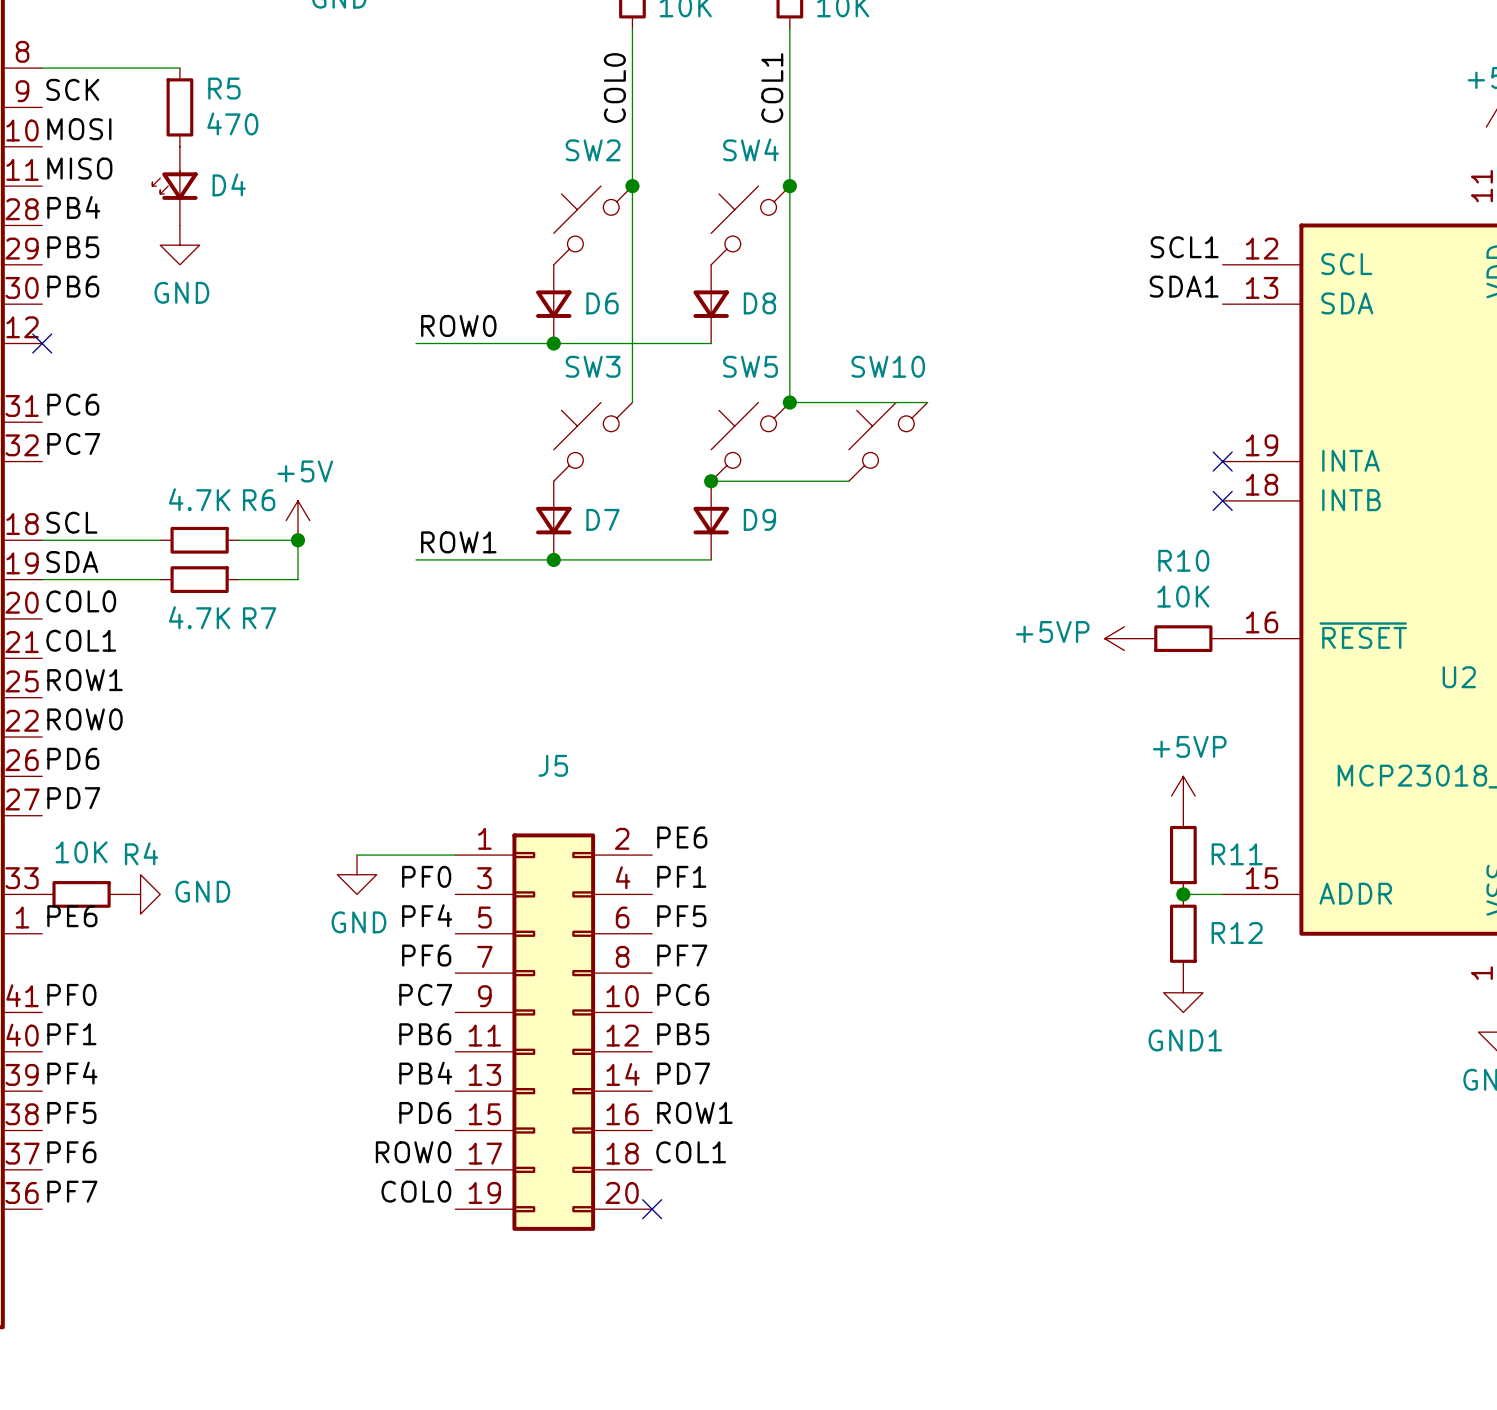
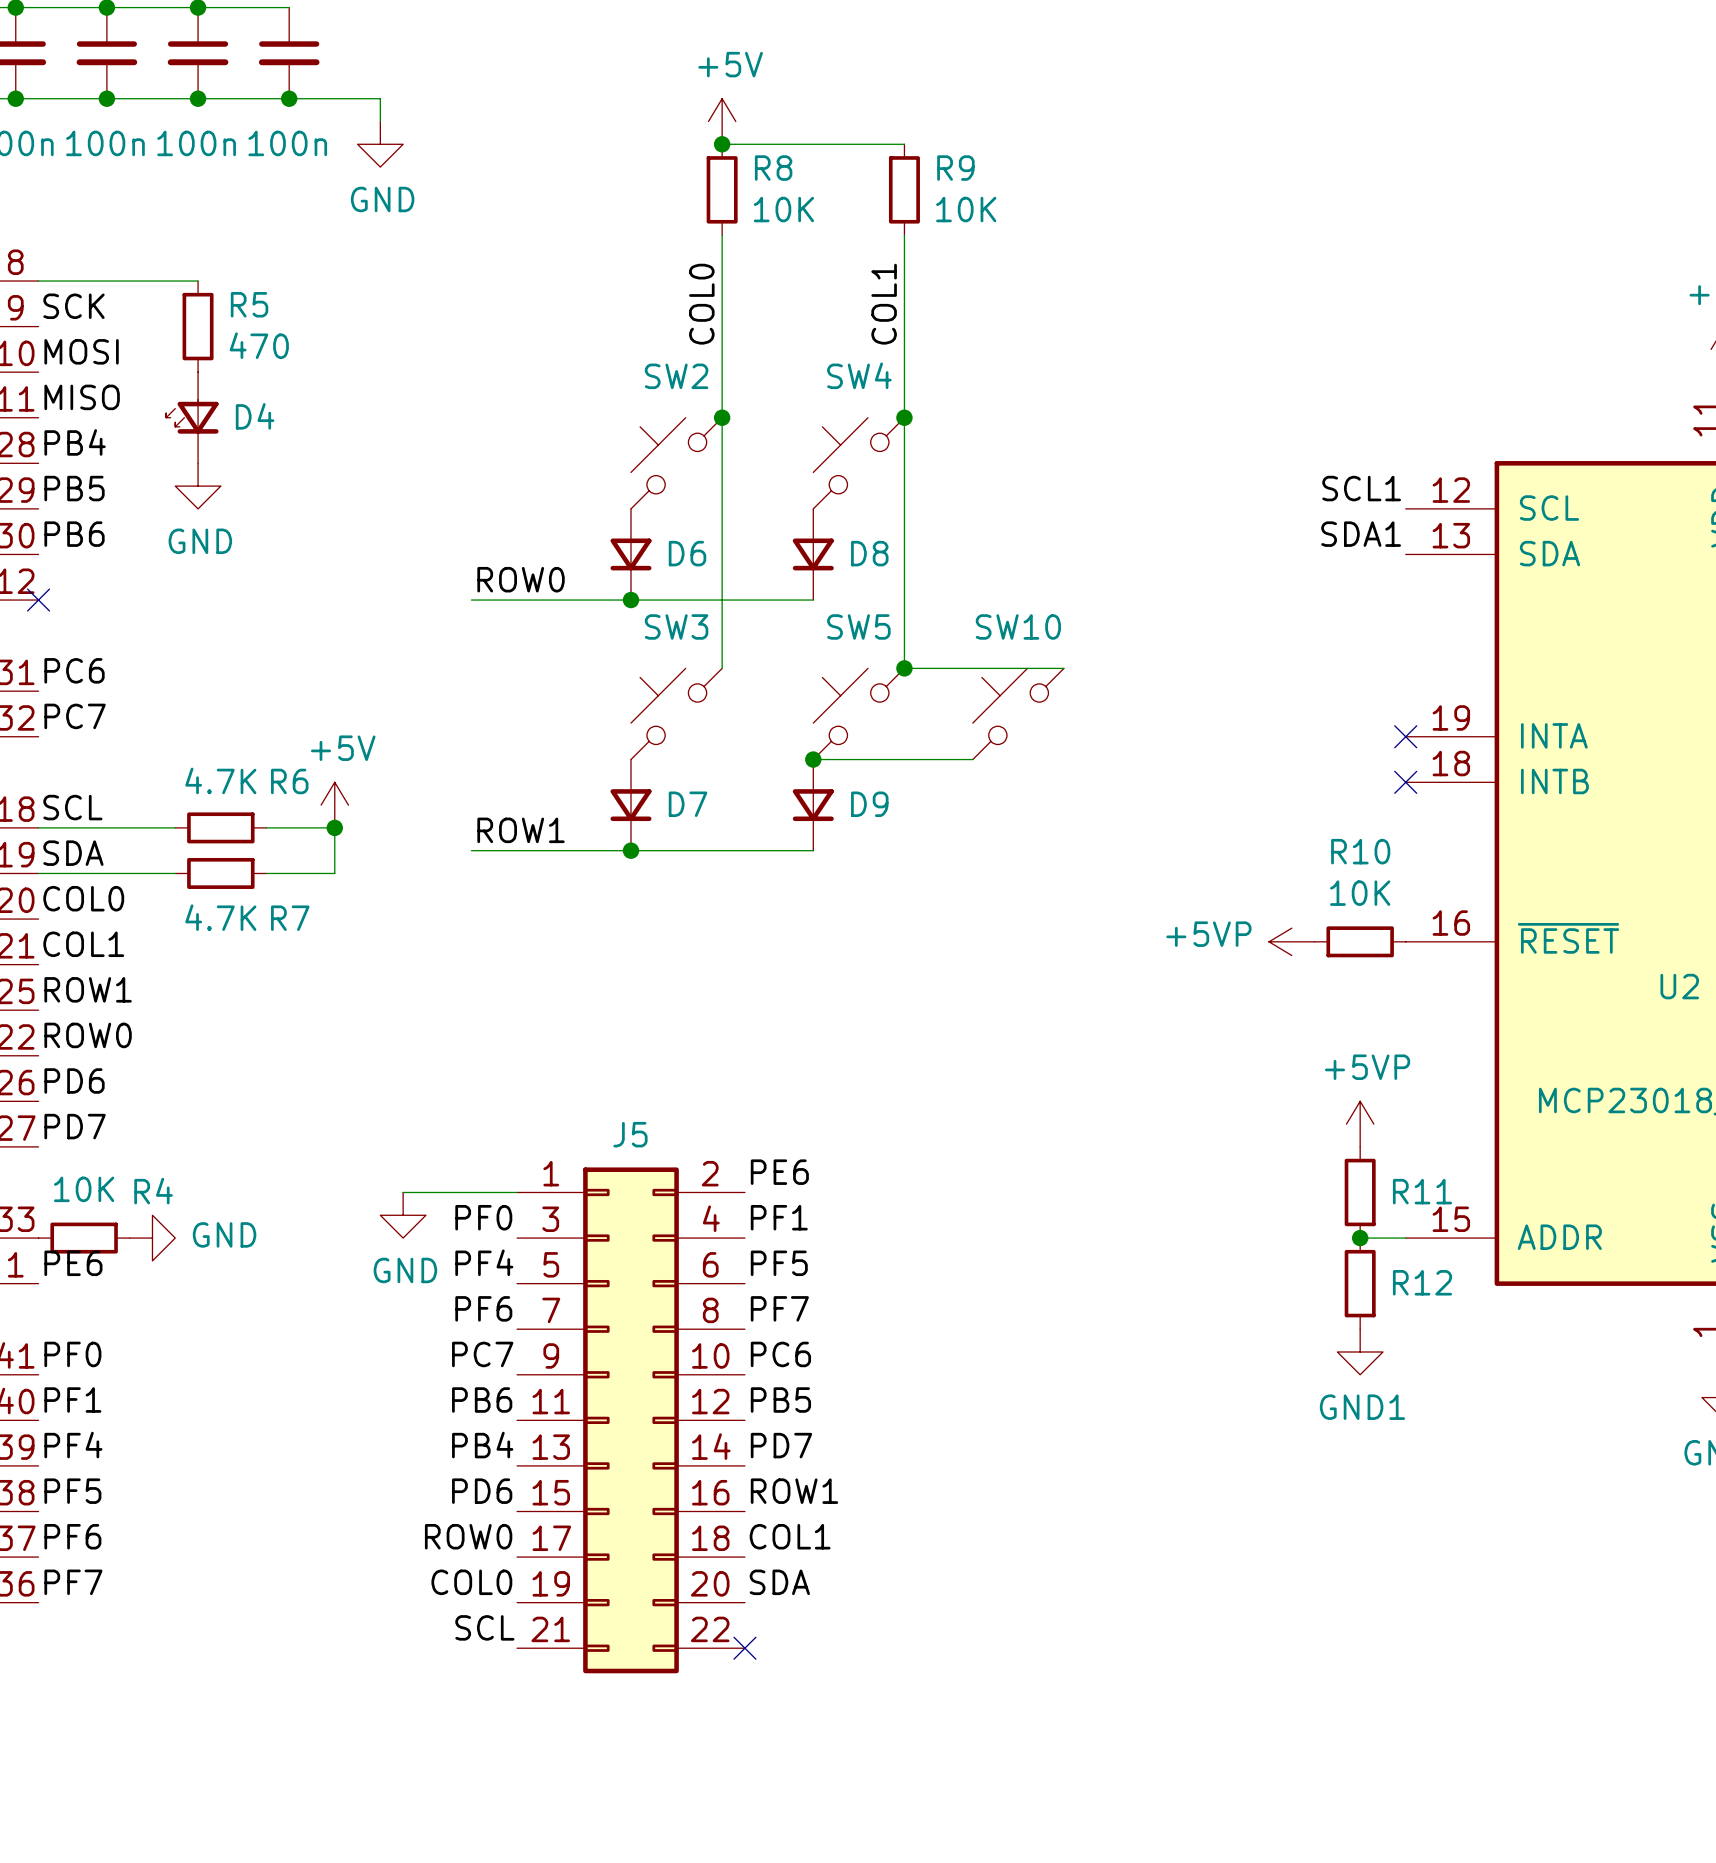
J5 symbol: [455, 833, 653, 1231] -> [517, 1167, 745, 1674]
label: none -> SDA (779, 1582)
no-connect mark position: (652, 1209) -> (744, 1648)
label: none -> SCL (484, 1627)

